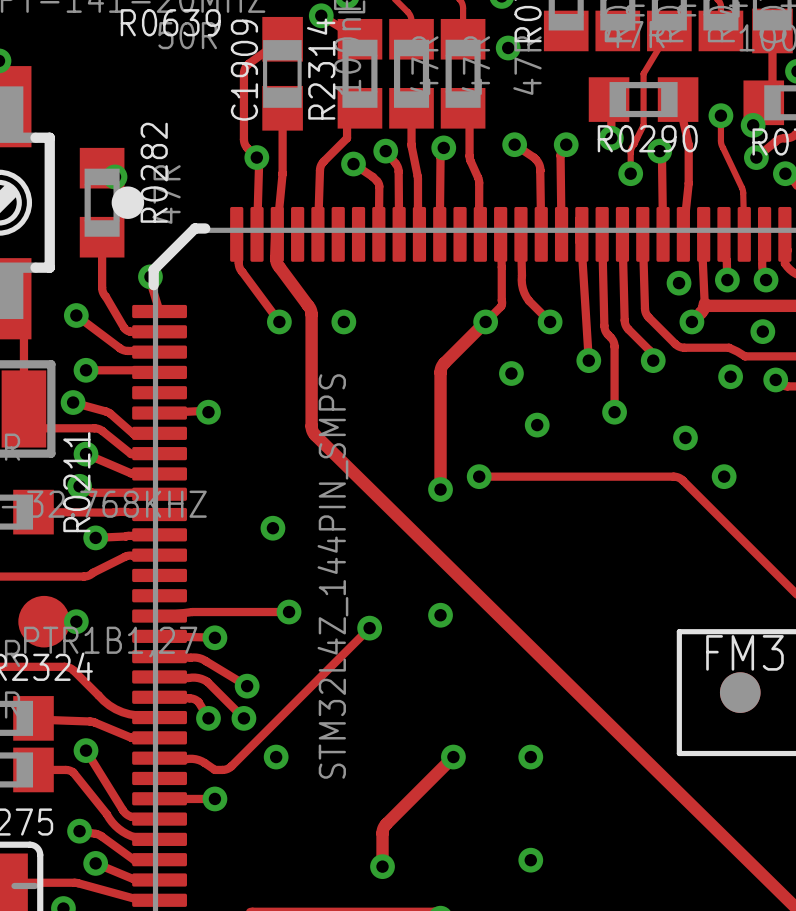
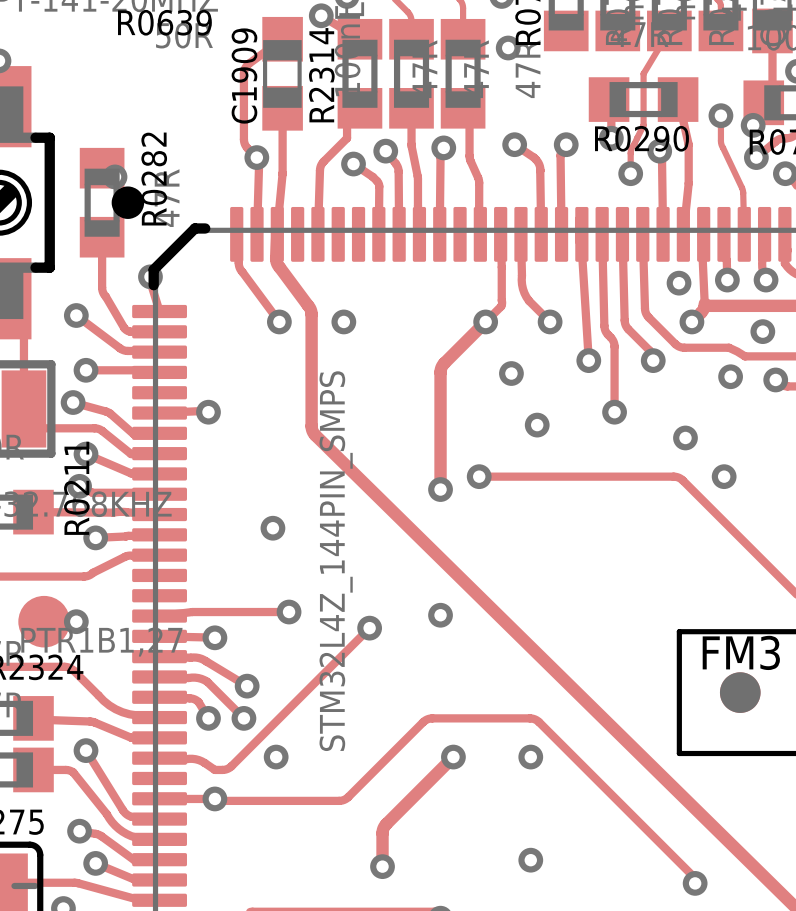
track: none -> (214, 799) (215, 800) (342, 800) (348, 797) (427, 719) (531, 718) (539, 722) (695, 878) (695, 883)
via: none -> (695, 883)

